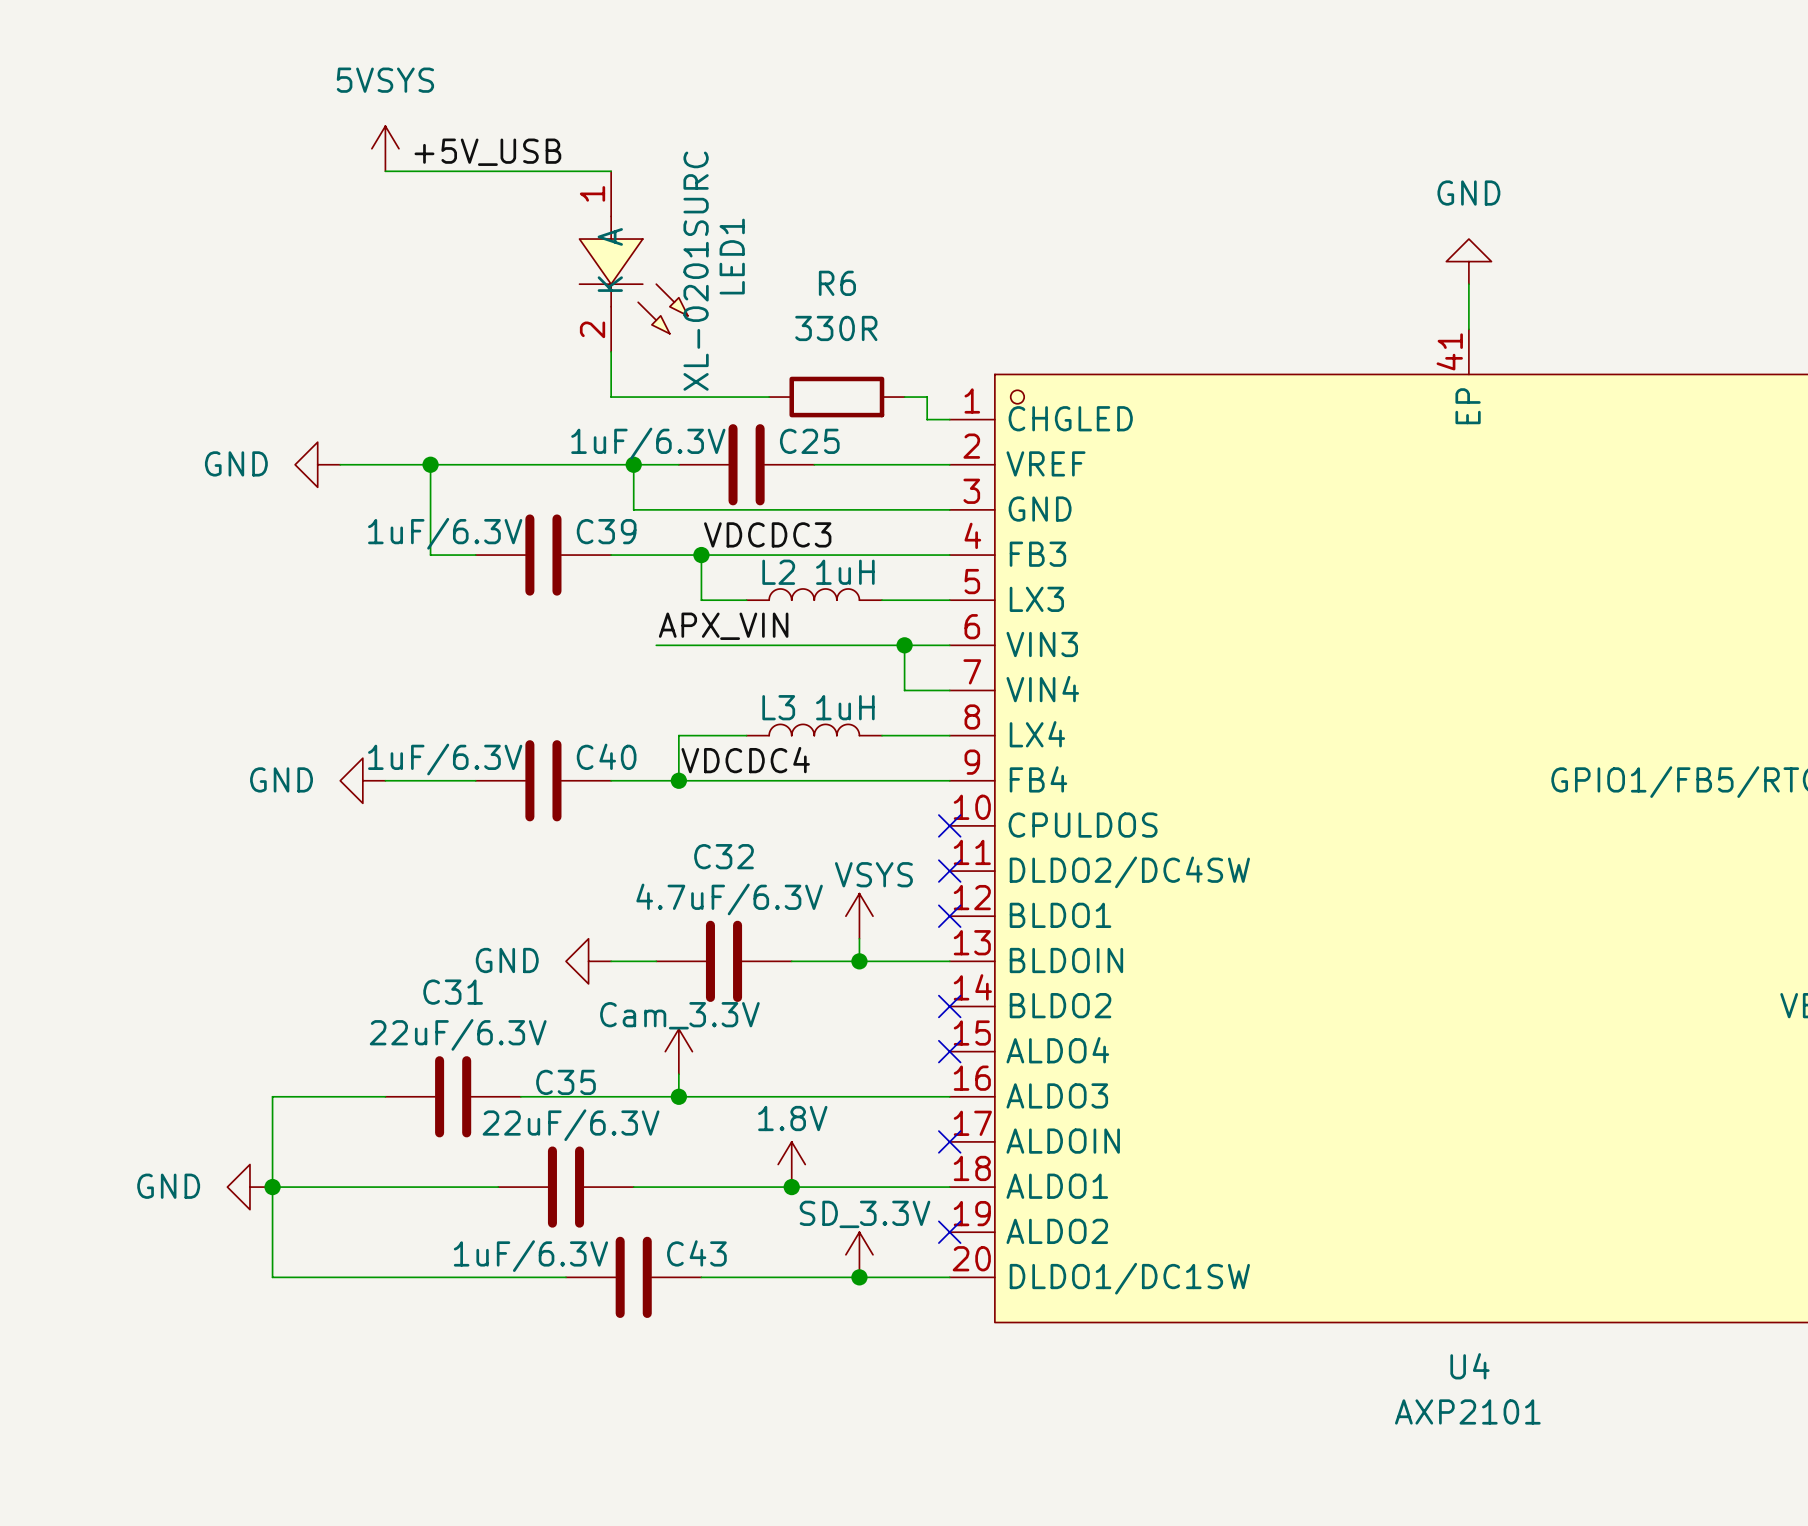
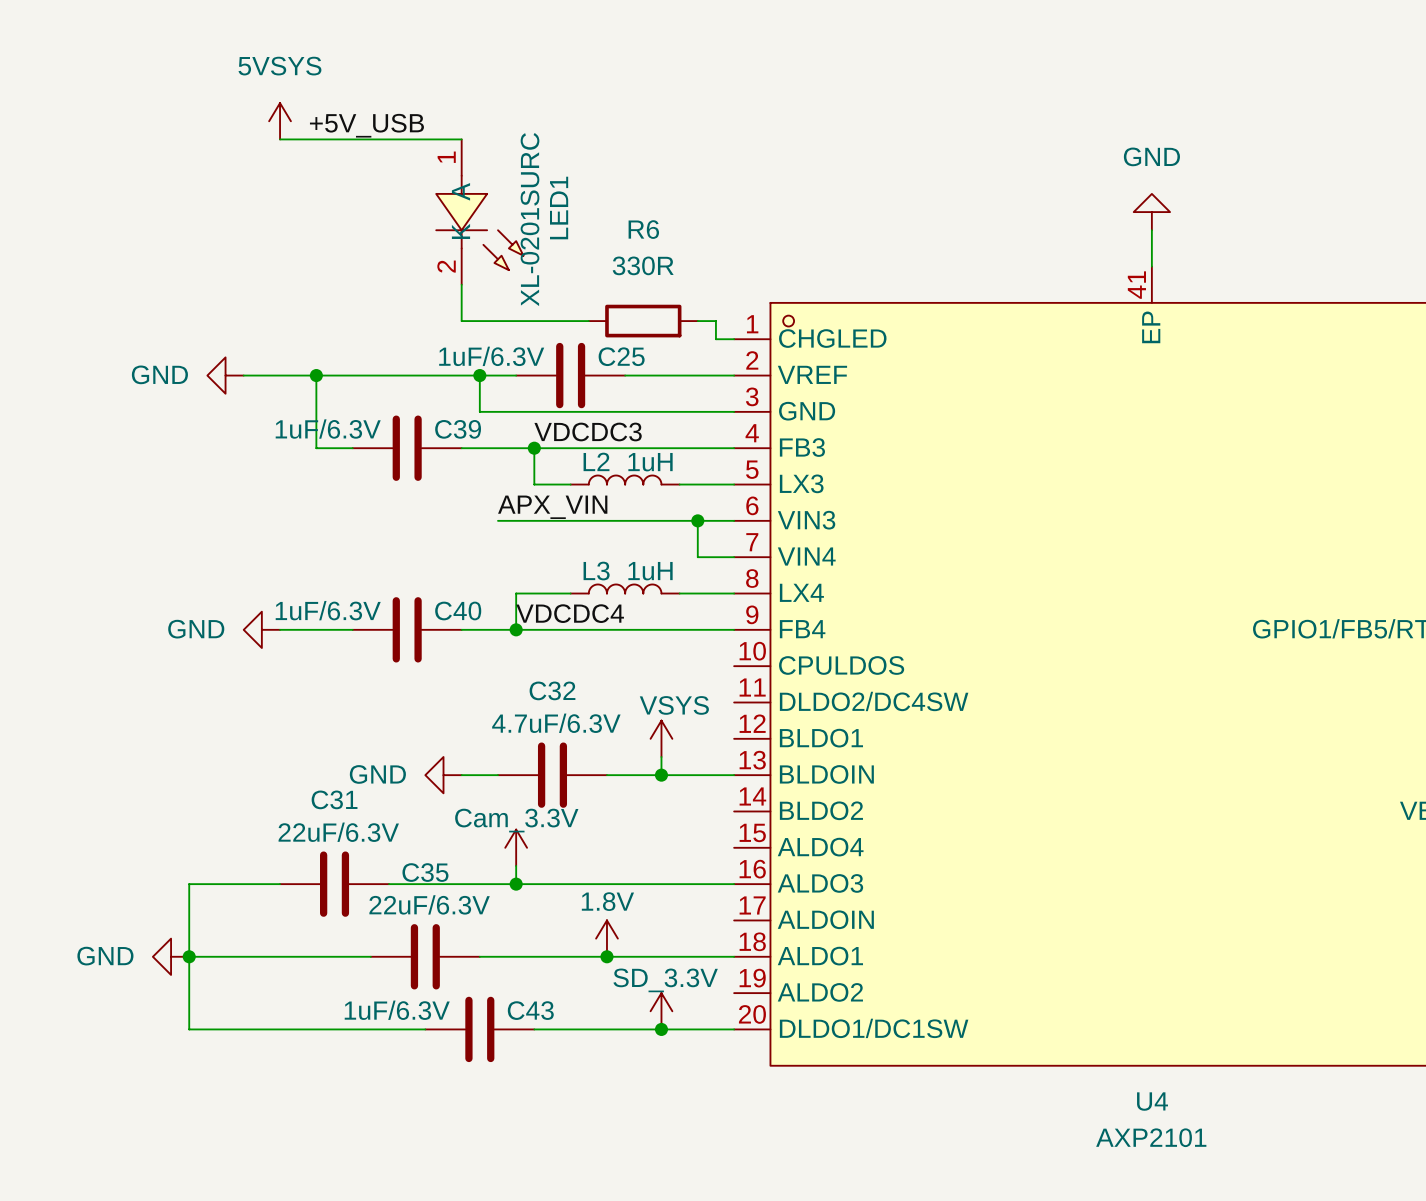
no-connect mark: (949, 825) -> none
no-connect mark: (949, 871) -> none
no-connect mark: (949, 916) -> none
no-connect mark: (949, 1006) -> none
no-connect mark: (949, 1051) -> none
no-connect mark: (949, 1141) -> none
no-connect mark: (949, 1232) -> none

